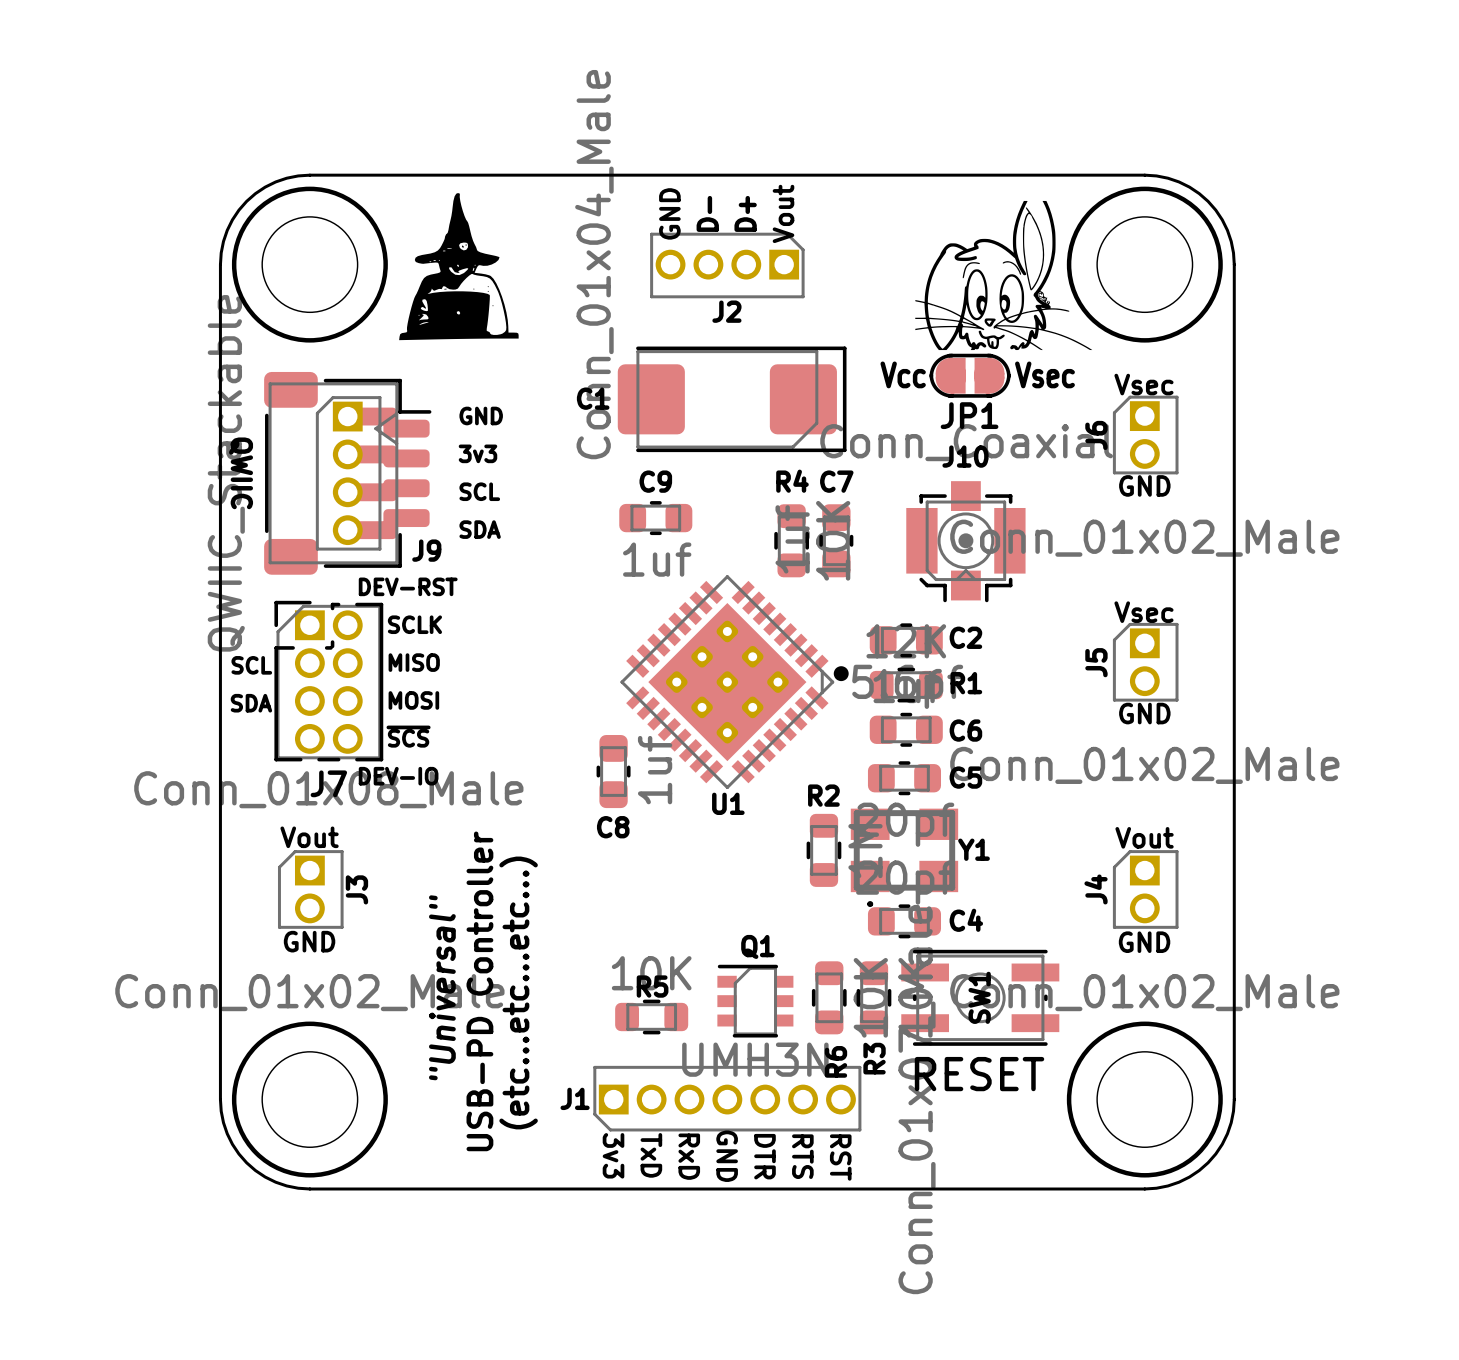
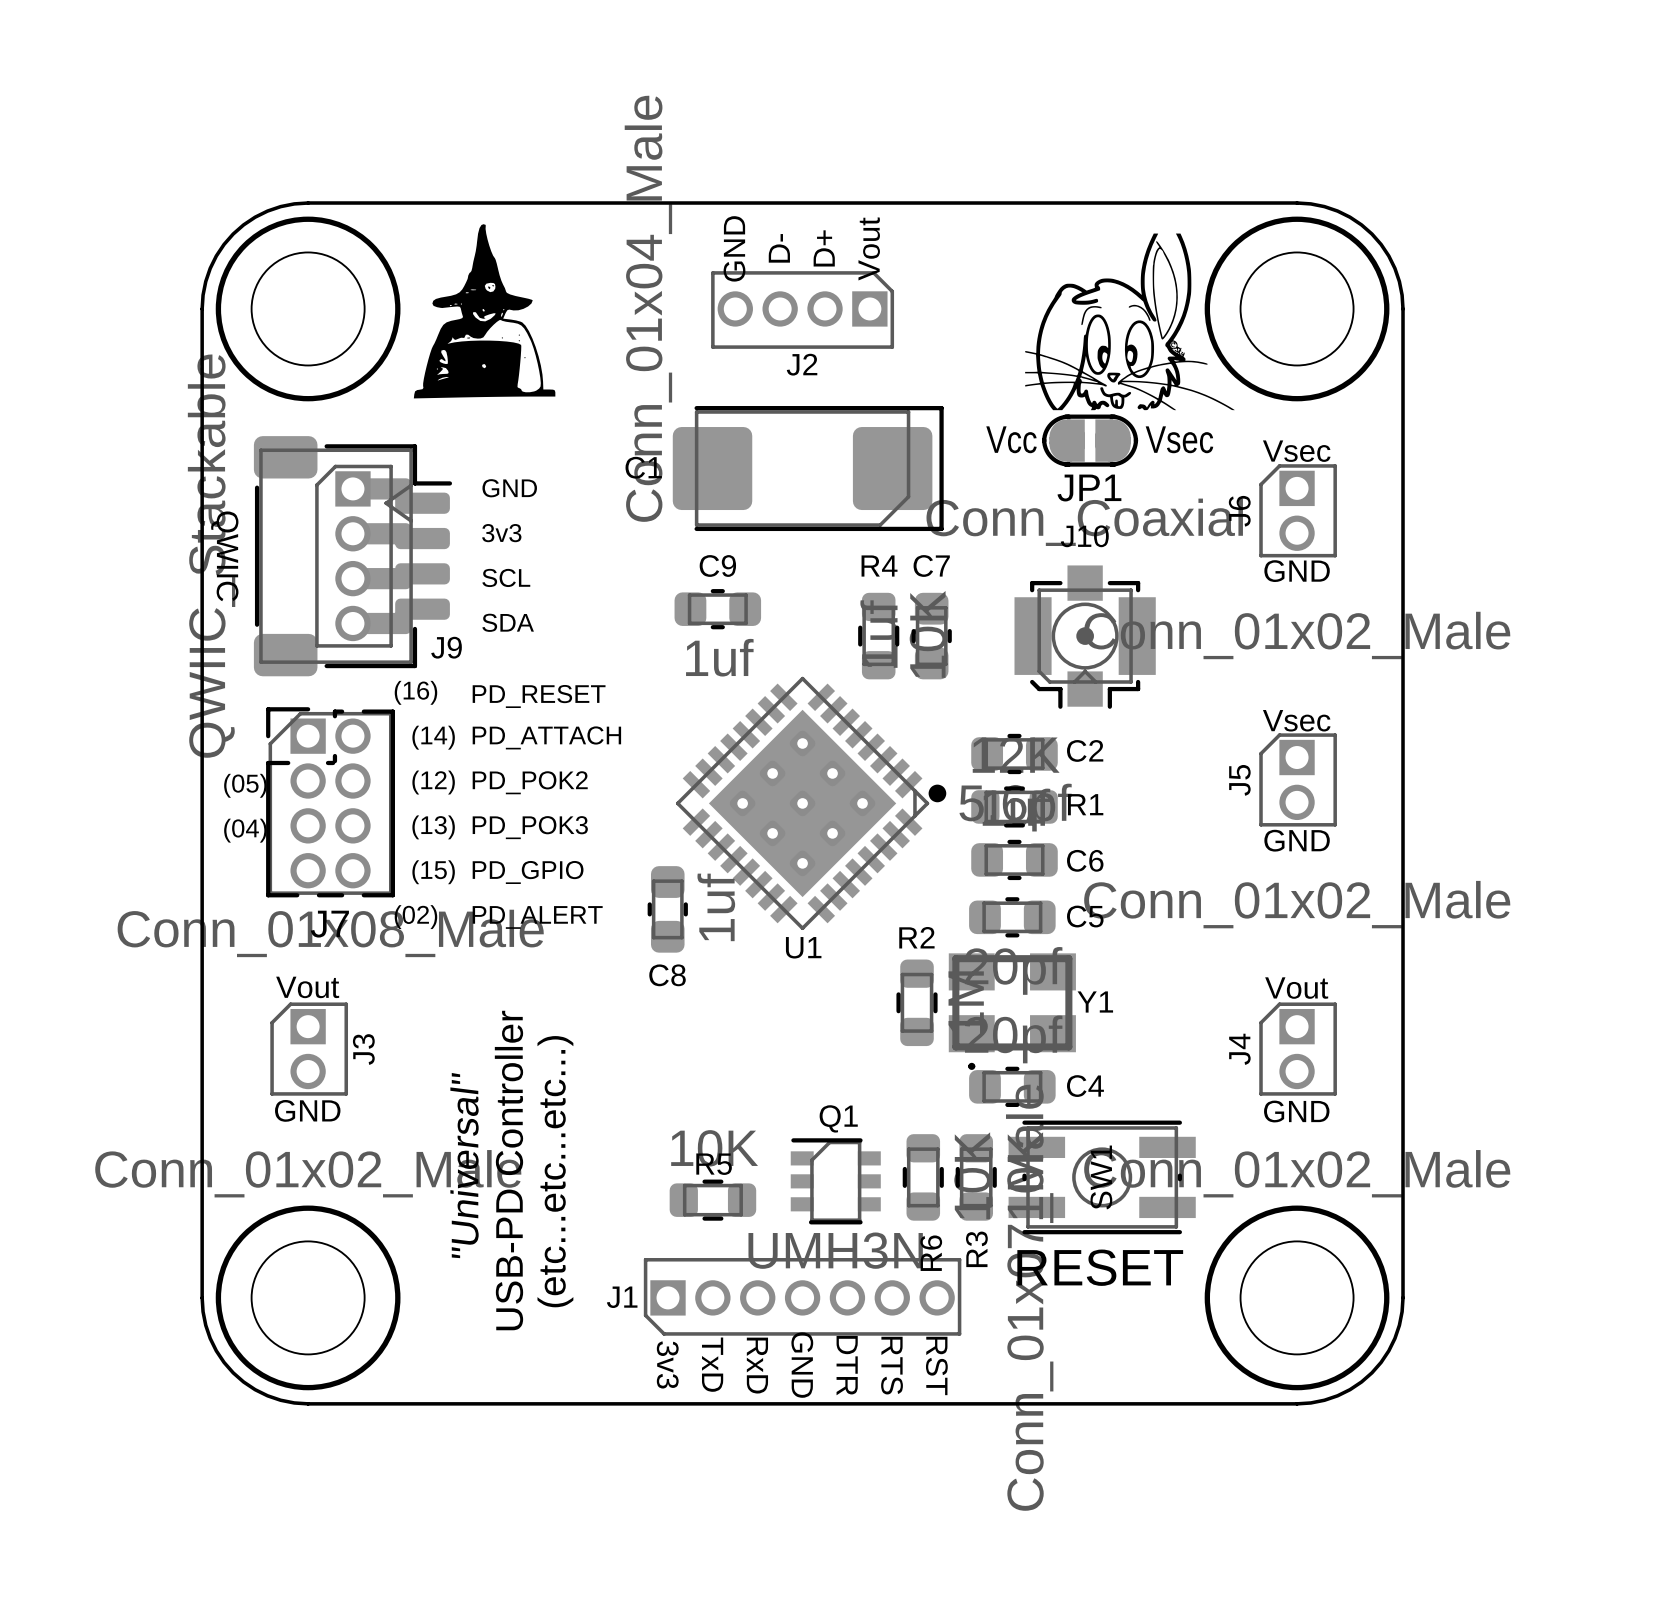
text: DEV-RST (408, 586) -> none
text: none -> (16) (415, 692)
text: none -> PD_RESET (539, 696)
text: SCLK (414, 624) -> none
text: none -> PD_ATTACH (546, 737)
text: none -> (14) (433, 737)
text: MISO (414, 662) -> none
text: none -> PD_POK2 (530, 782)
text: none -> (12) (433, 782)
text: SCL (251, 665) -> (05) (245, 785)
text: MOSI (413, 700) -> none
text: none -> PD_POK3 (530, 827)
text: none -> (13) (433, 827)
text: SDA (251, 703) -> (04) (245, 830)
text: ~{SCS} (408, 736) -> none
text: none -> PD_GPIO (528, 872)
text: none -> (15) (433, 872)
text: DEV-IO (398, 776) -> none
text: none -> PD_ALERT (537, 917)
text: none -> (02) (415, 917)

